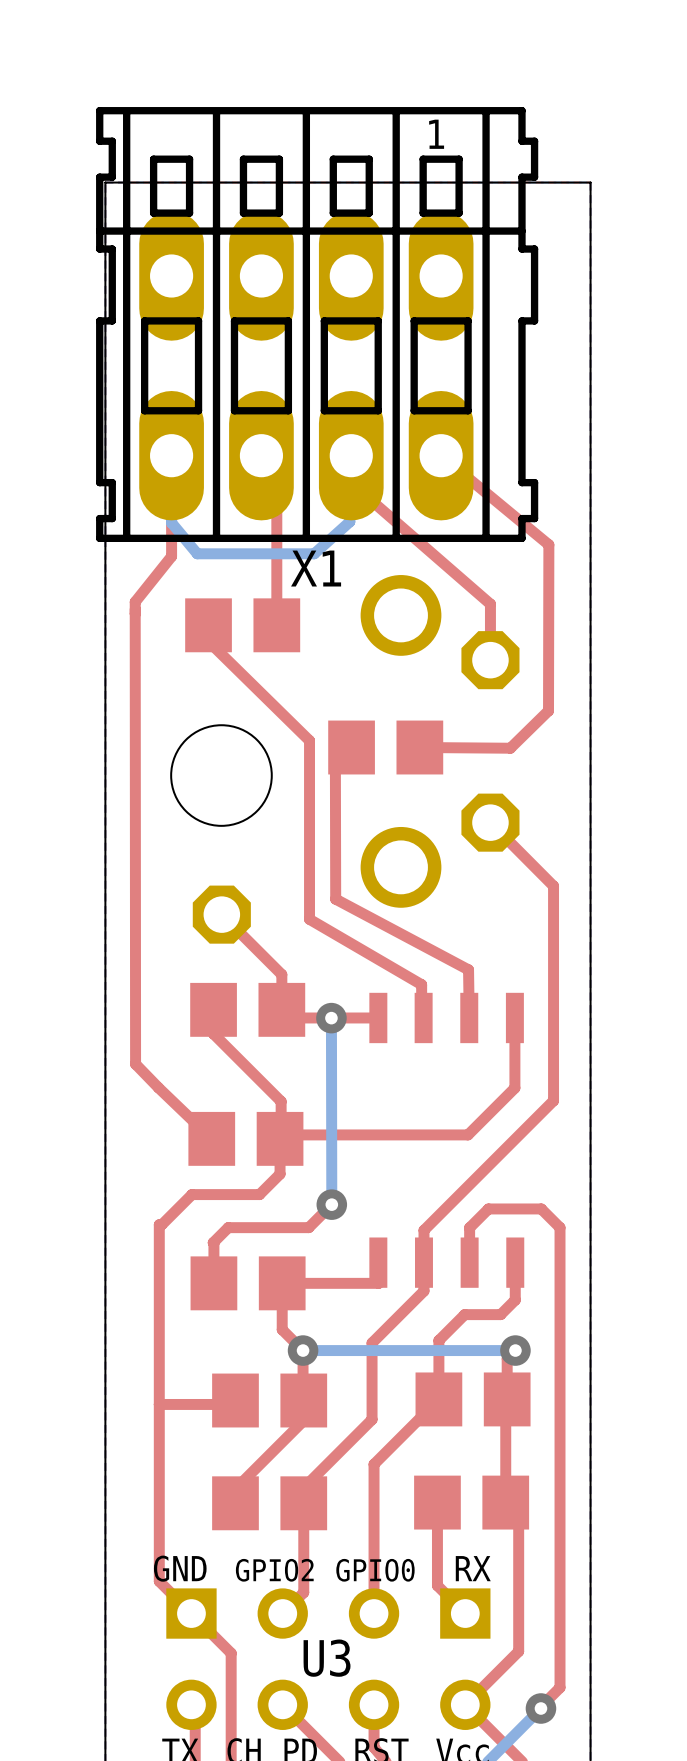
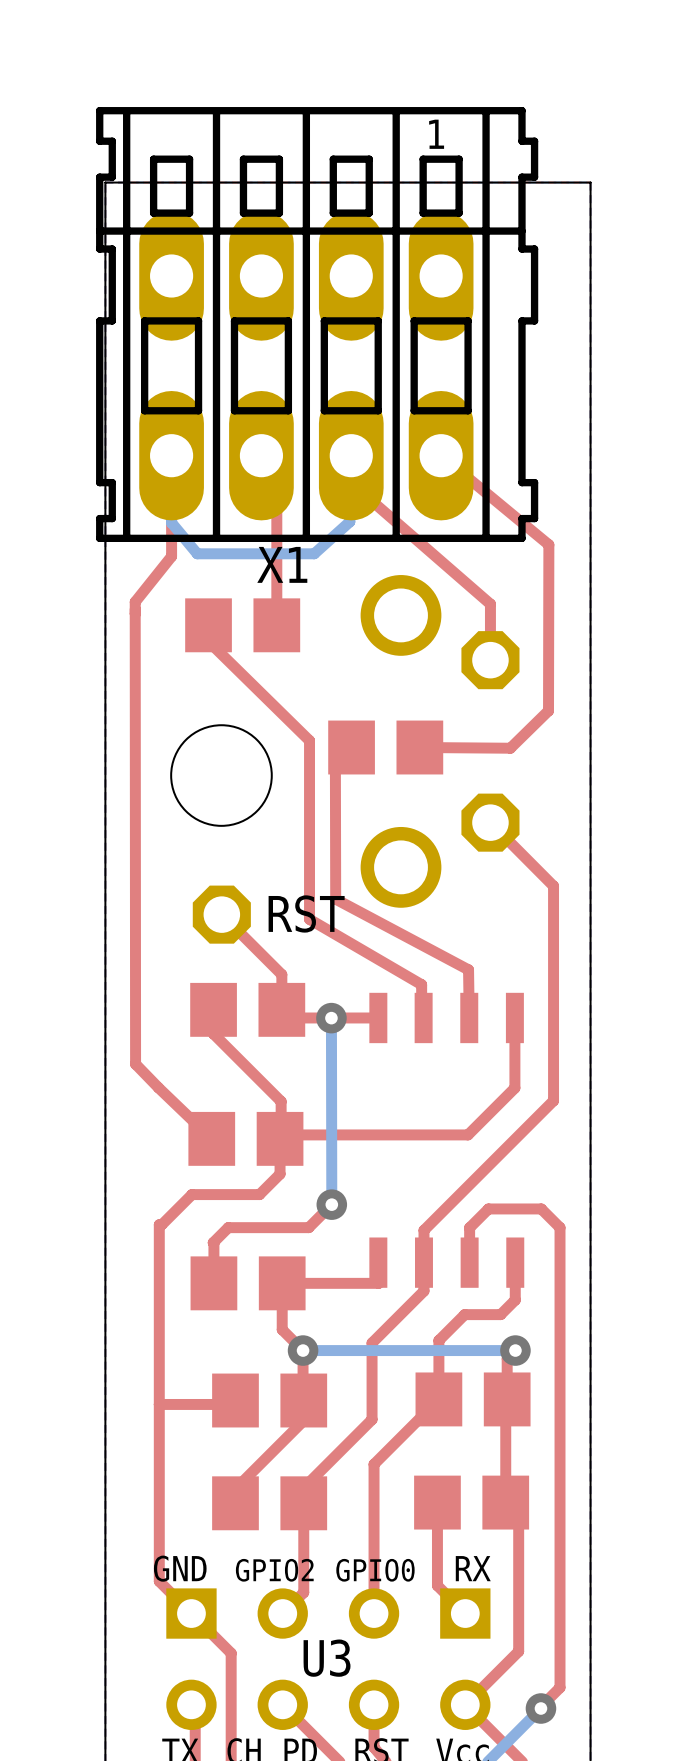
X1 name position: X1 (316, 568) -> X1 (282, 564)
RST name: none -> RST (306, 913)

